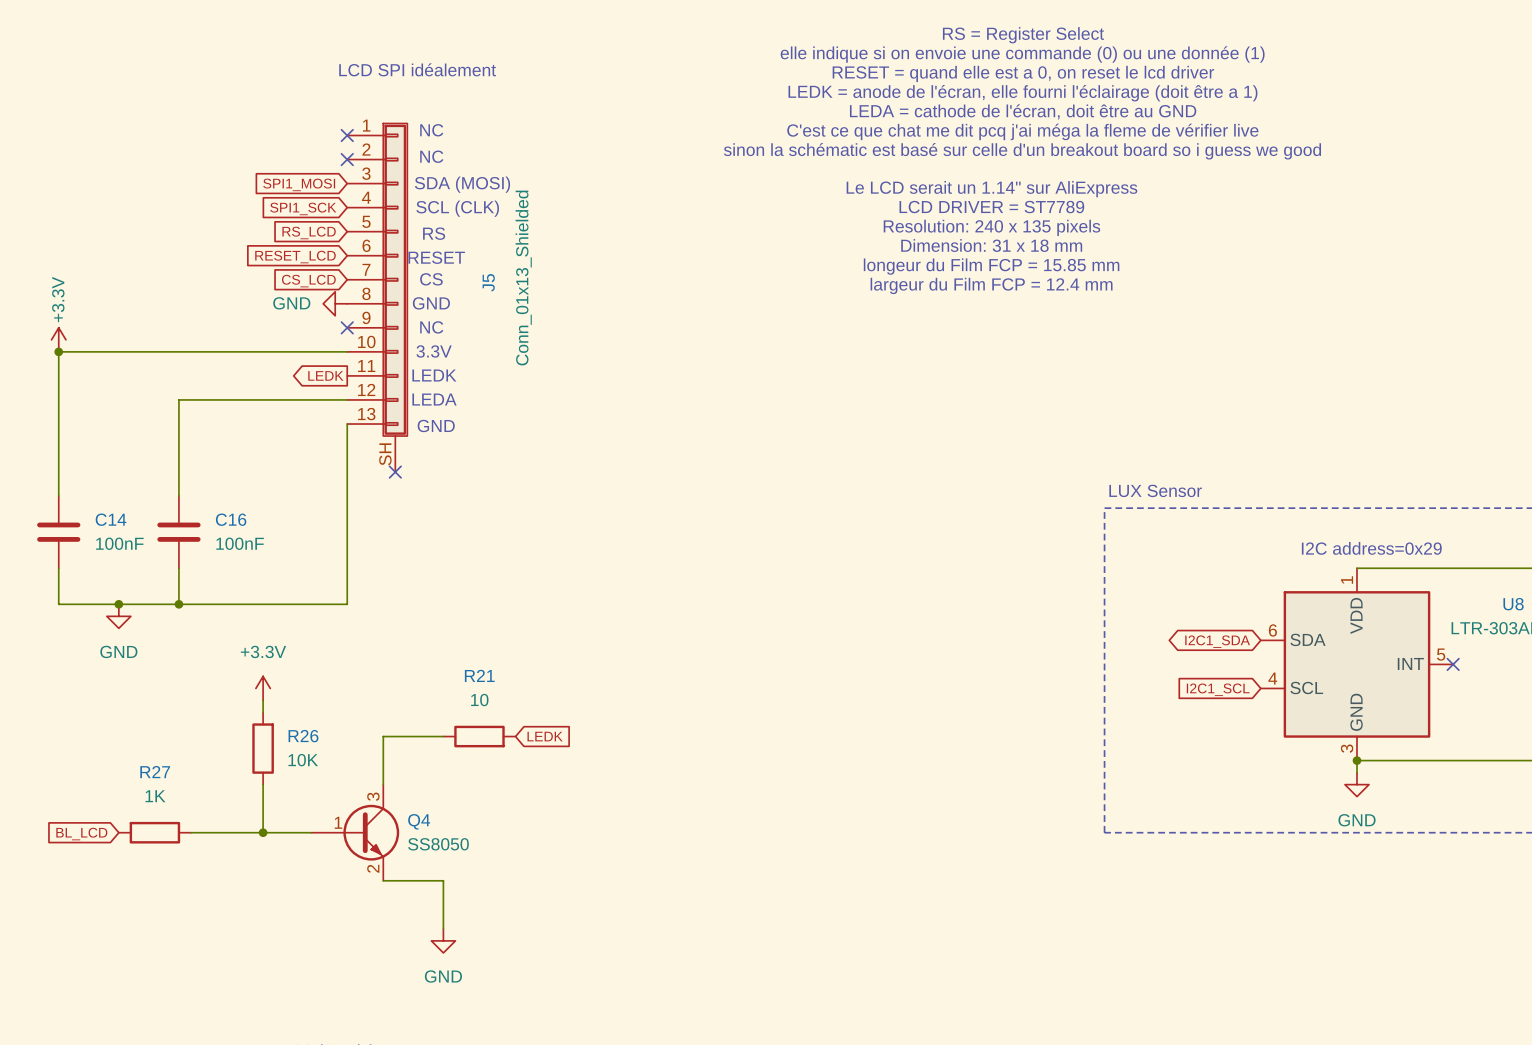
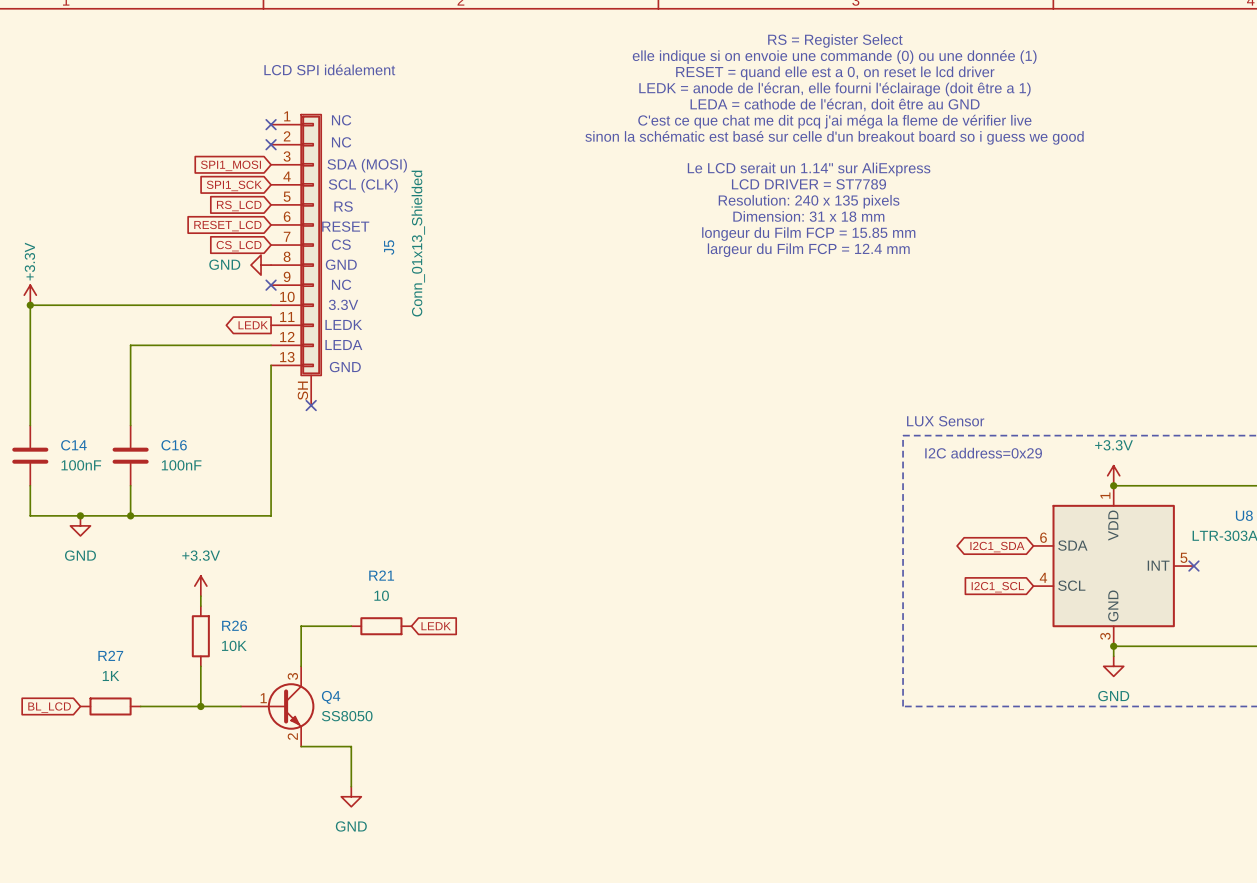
text position: I2C address=0x29 (1371, 548) -> I2C address=0x29 (983, 453)
power symbol: none -> +3.3V (1113, 475)
junction: none -> (1113, 485)

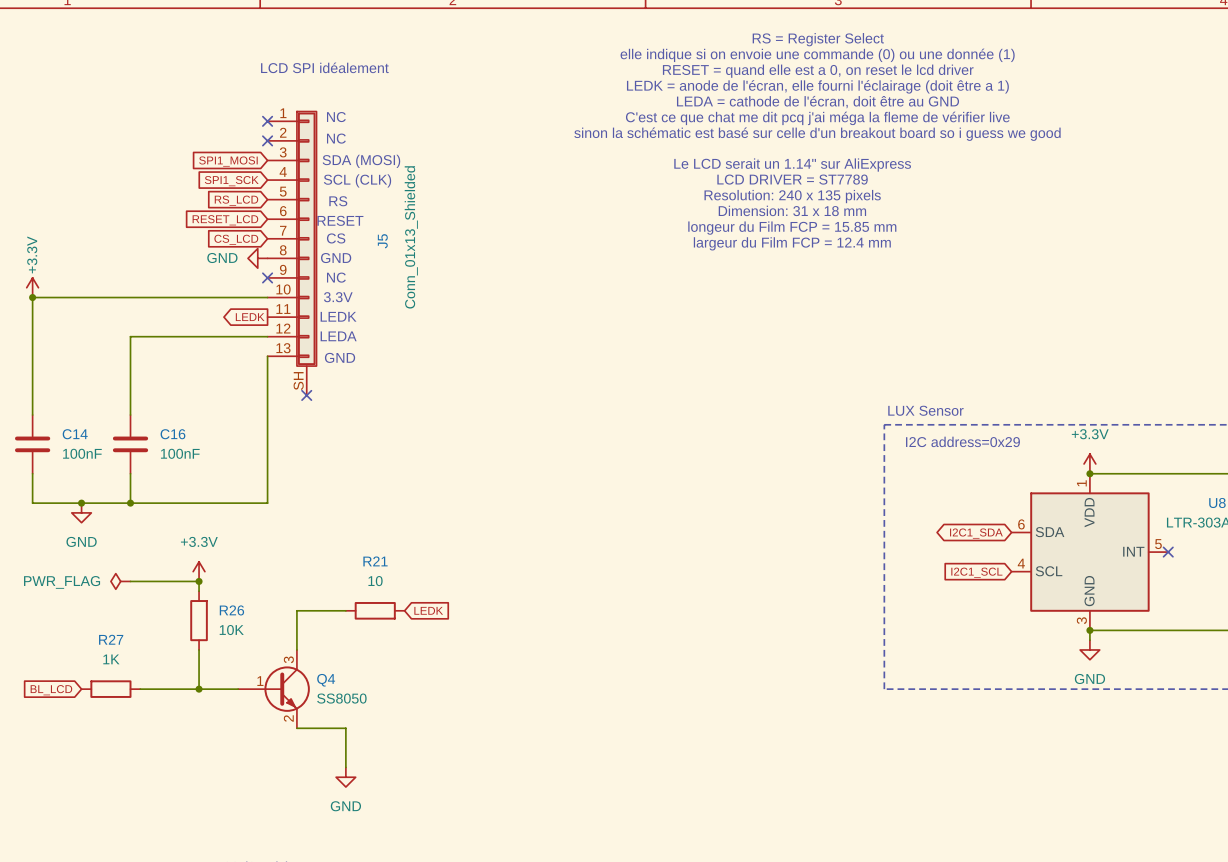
power symbol: none -> PWR_FLAG (120, 581)
wire: none -> (130, 581) (199, 581)
junction: none -> (199, 581)

